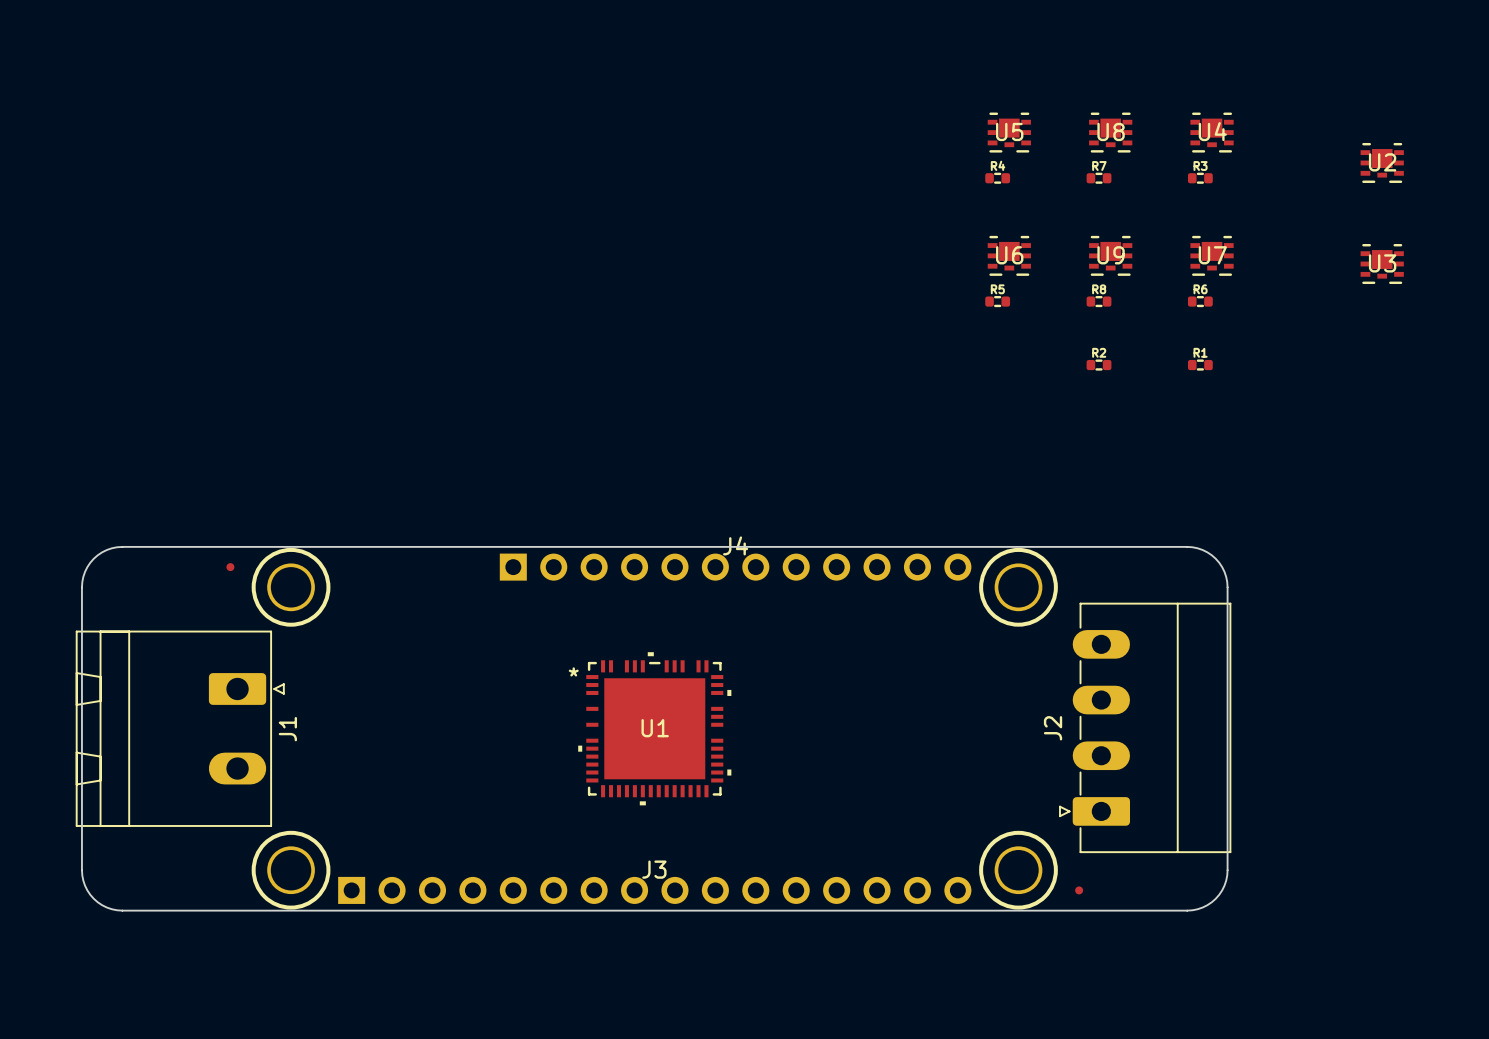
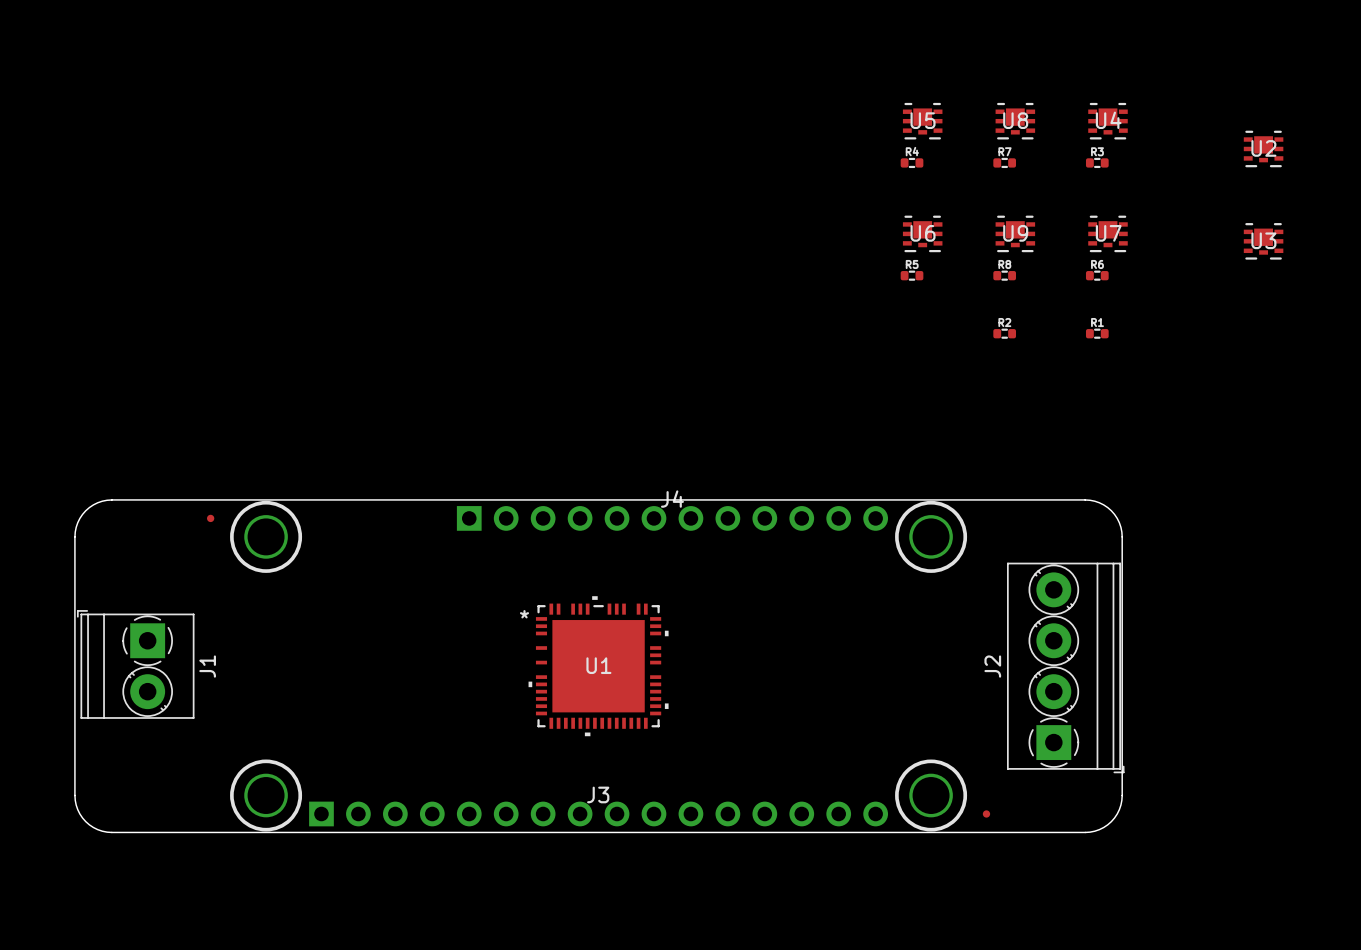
J2 footprint: [1059, 602, 1232, 854] -> [1006, 562, 1125, 774]
J1 footprint: [75, 630, 285, 827] -> [76, 610, 195, 719]

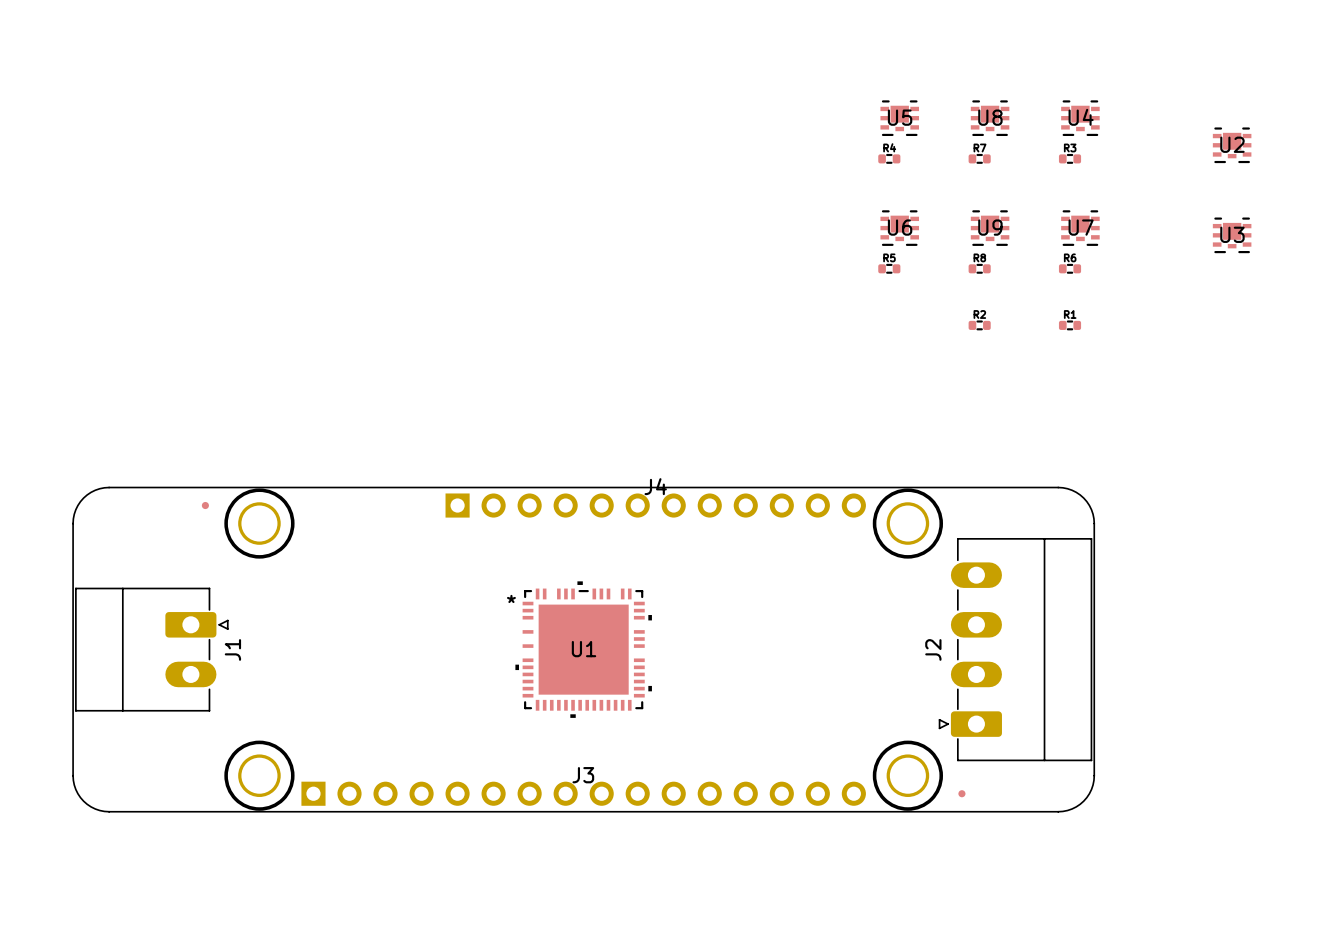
J2 footprint: [1006, 562, 1125, 774] -> [938, 538, 1093, 762]
J1 footprint: [76, 610, 195, 719] -> [75, 587, 229, 712]

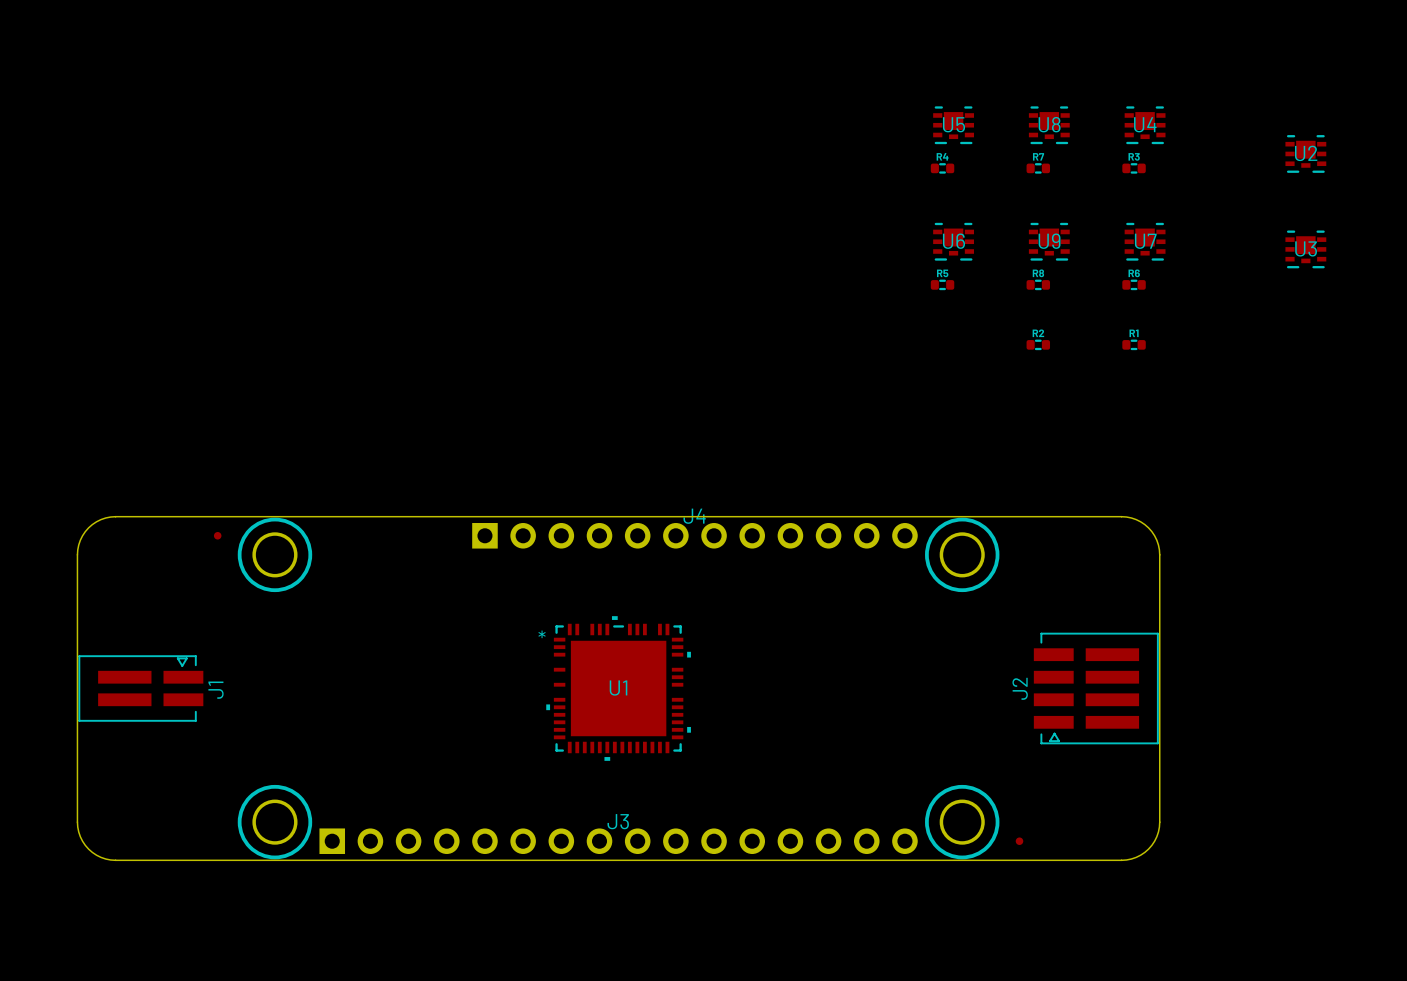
J2 footprint: [938, 538, 1093, 762] -> [1033, 632, 1159, 745]
J1 footprint: [75, 587, 229, 712] -> [78, 655, 204, 722]

